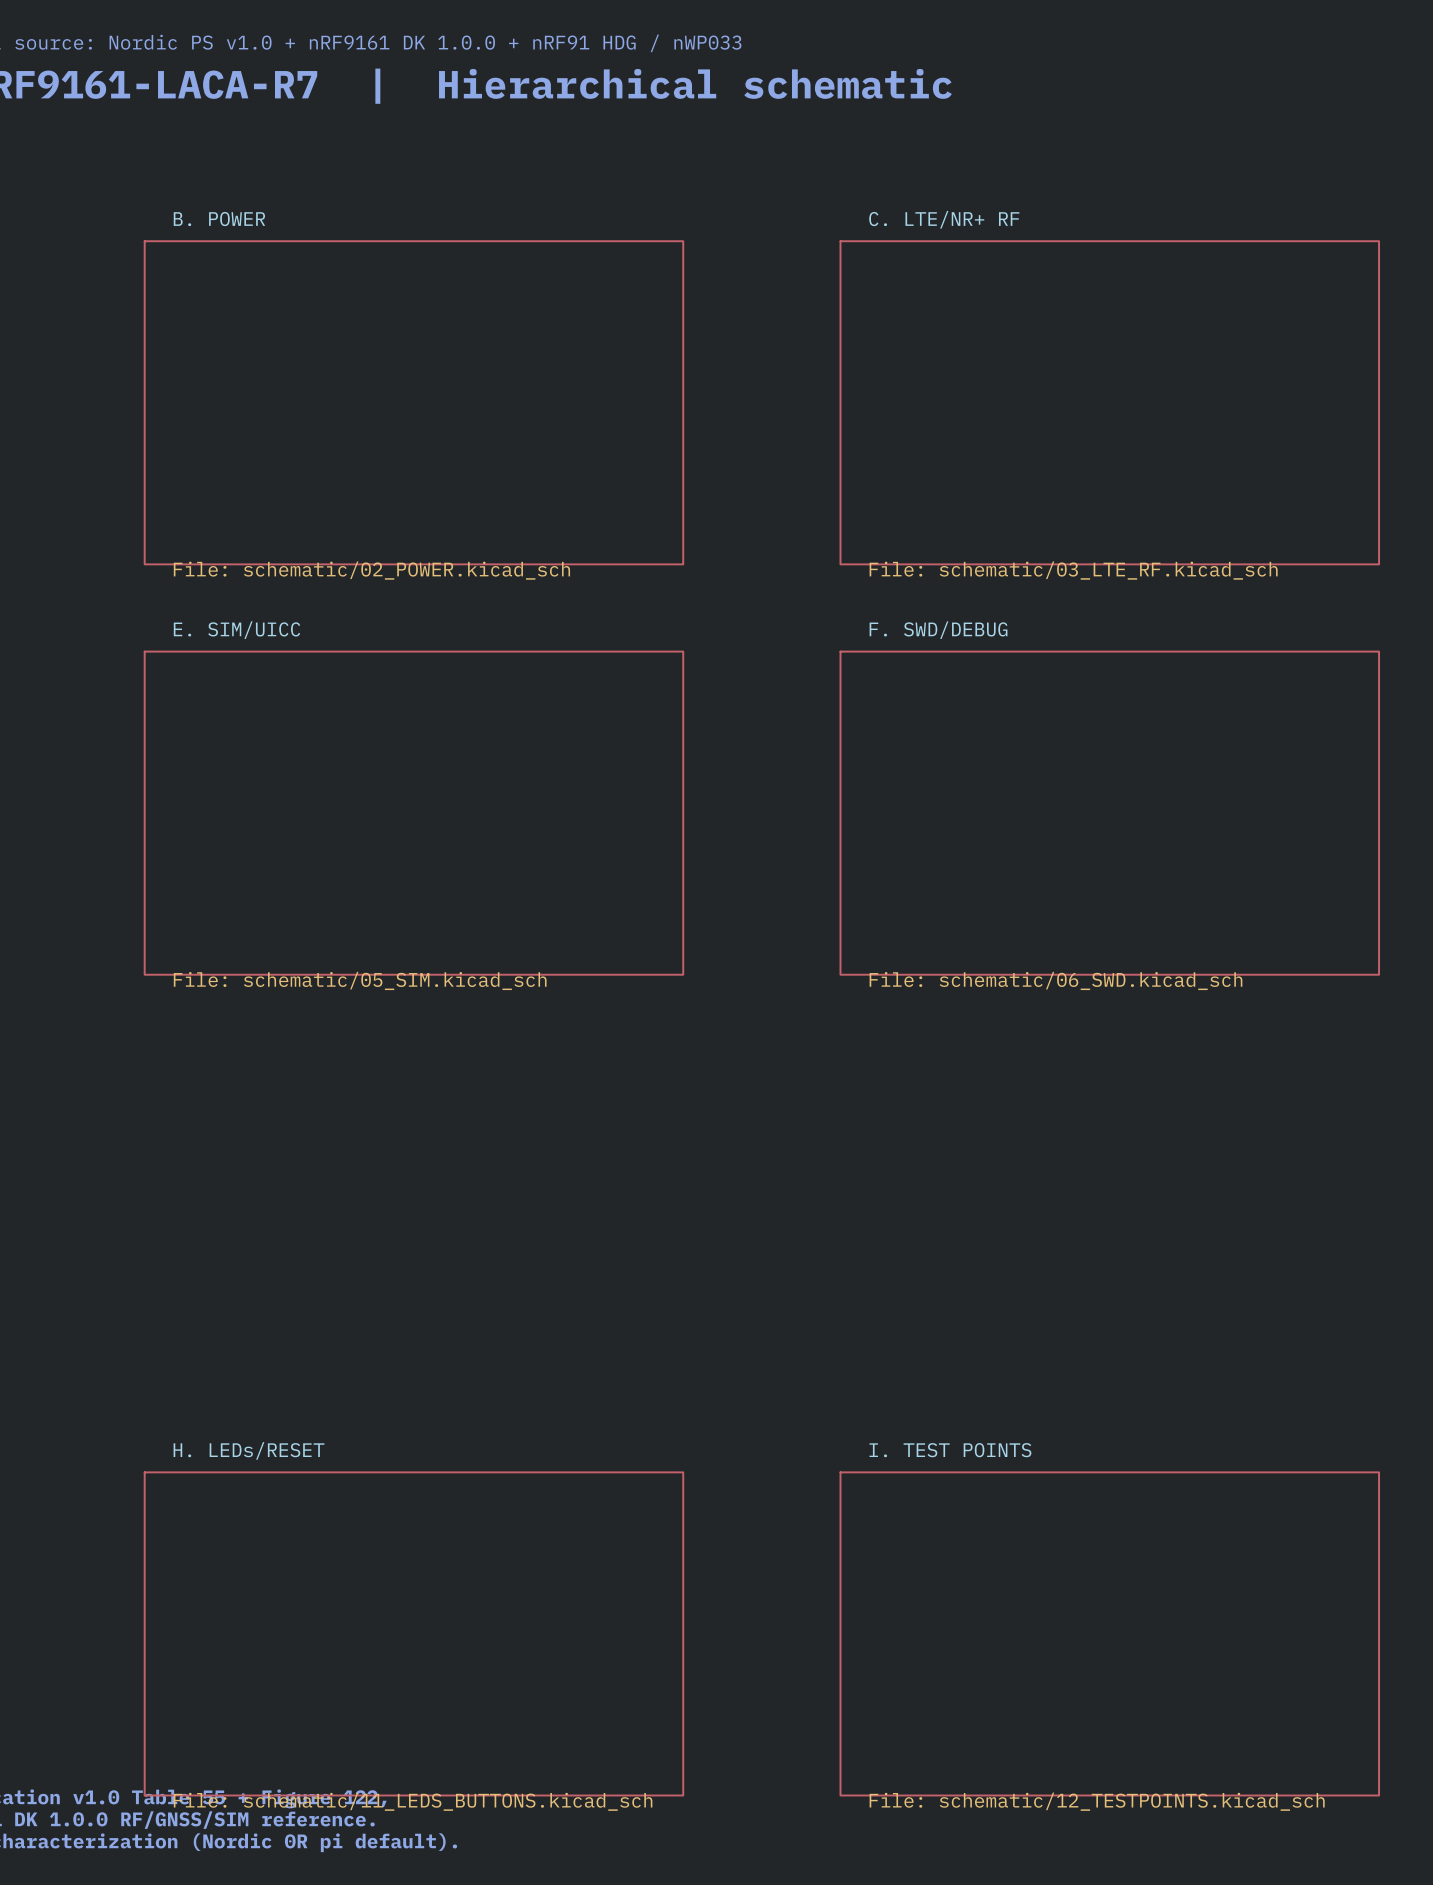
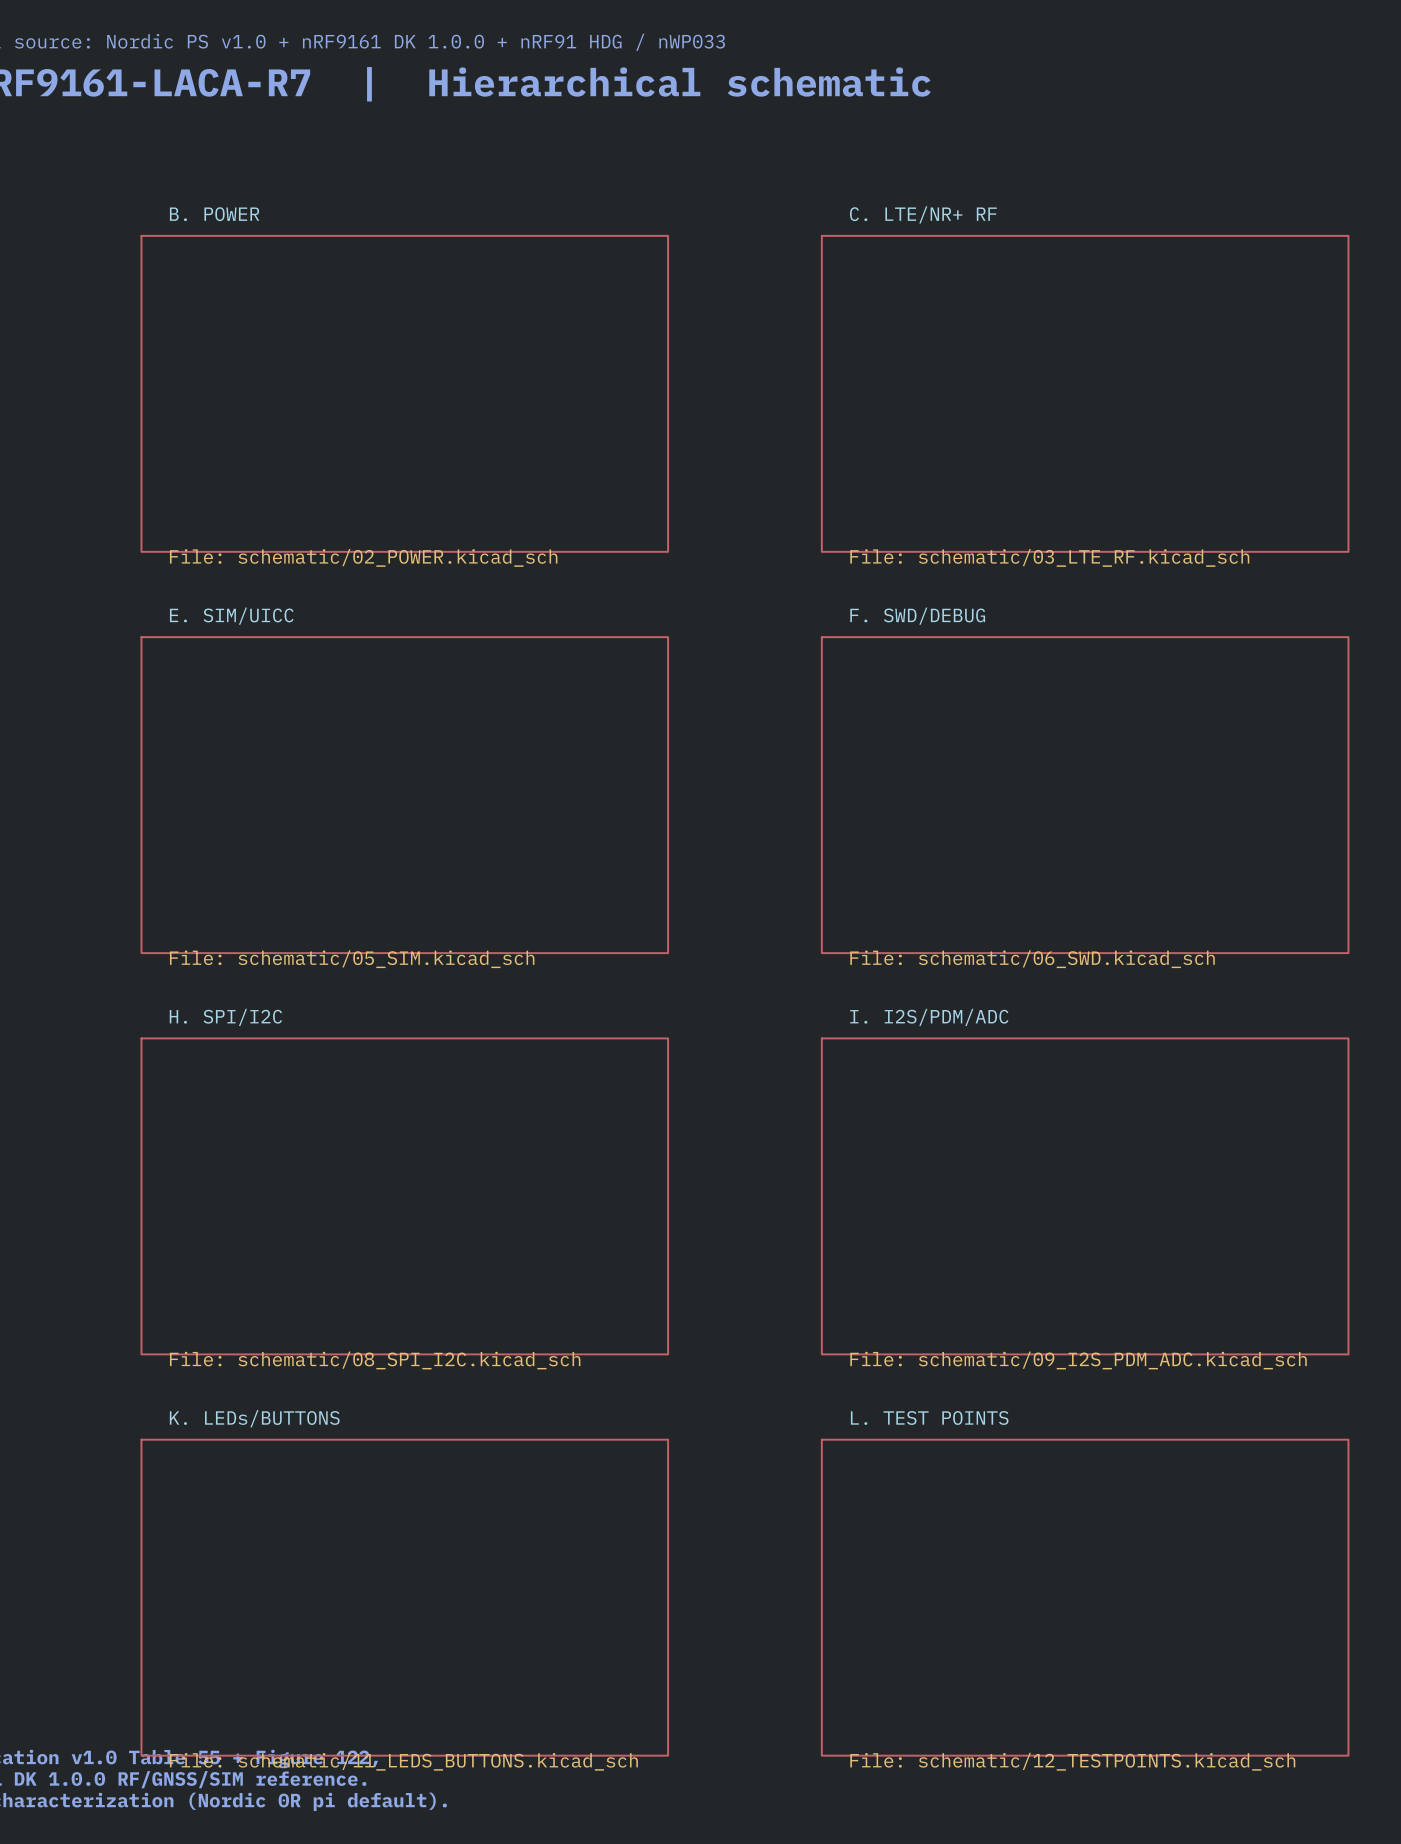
sheet H. SPI/I2C: none -> File: schematic/08_SPI_I2C.kicad_sch (404, 1196)
sheet I. I2S/PDM/ADC: none -> File: schematic/09_I2S_PDM_ADC.kicad_sch (1085, 1196)
sheet H. LEDs/RESET name: H. LEDs/RESET (249, 1450) -> K. LEDs/BUTTONS (254, 1418)
sheet I. TEST POINTS name: I. TEST POINTS (950, 1450) -> L. TEST POINTS (929, 1417)

